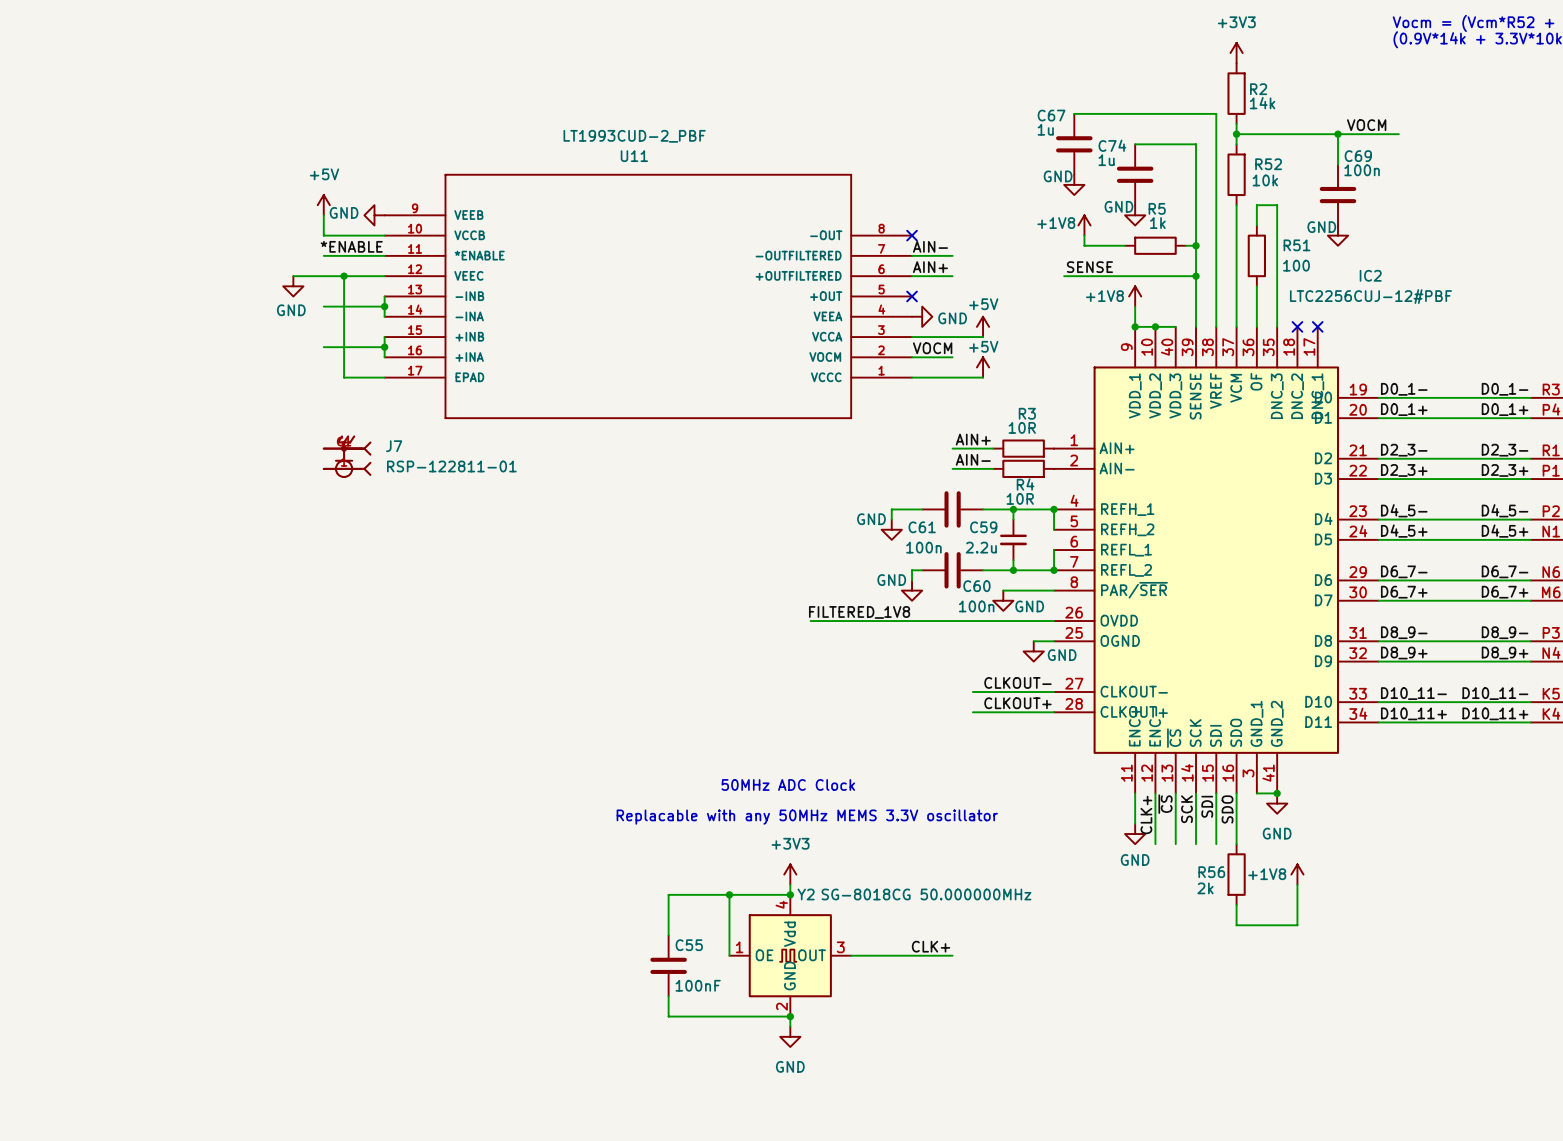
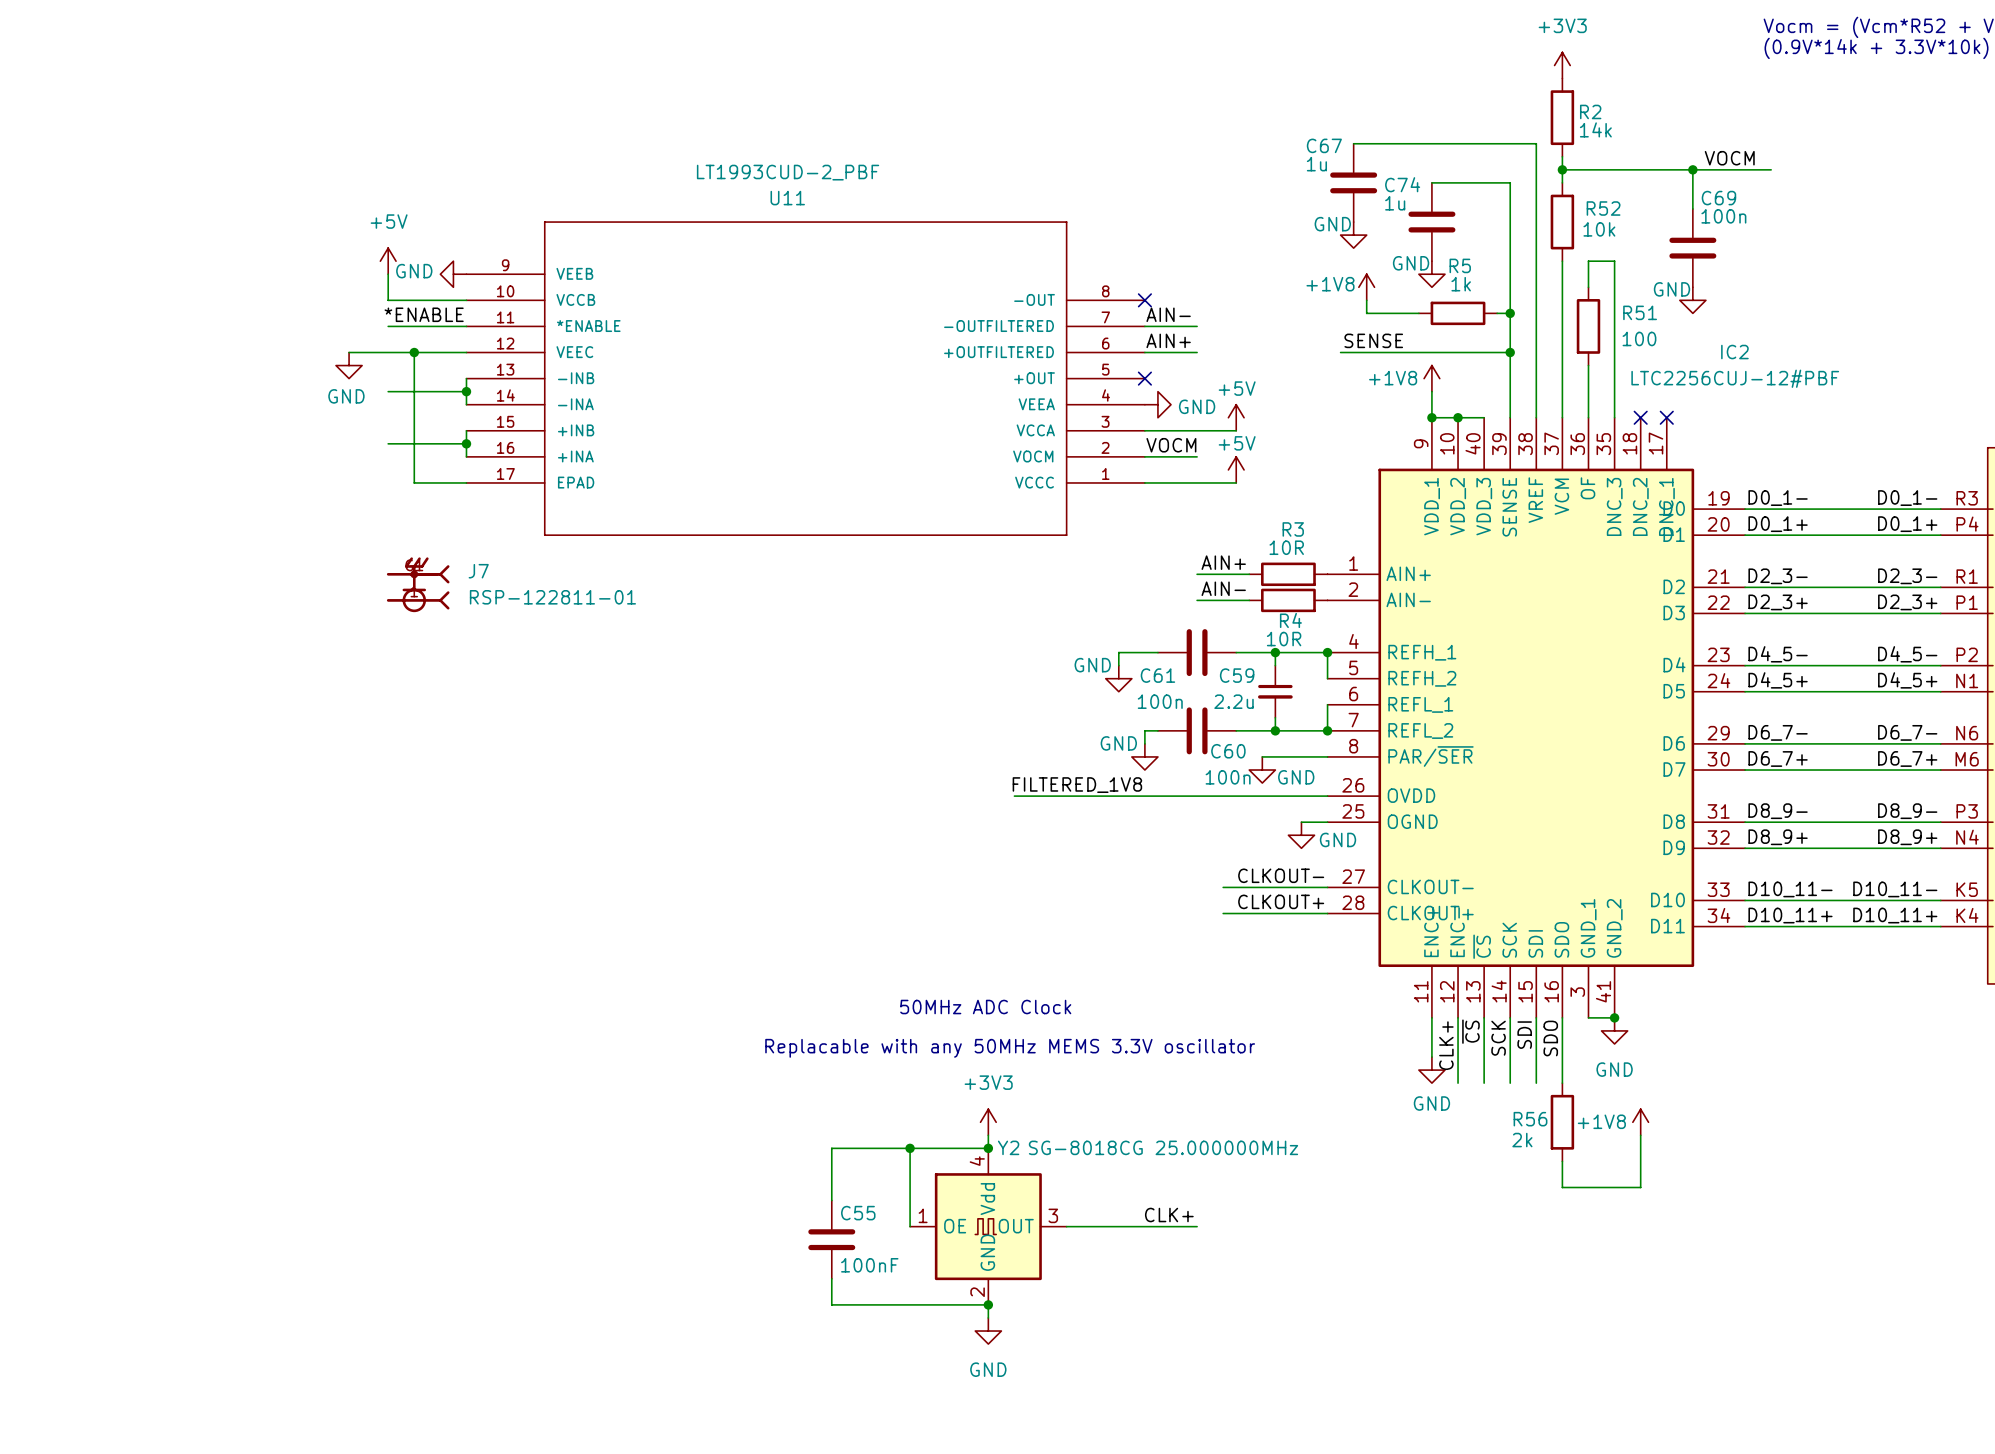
Y2 value: SG-8018CG 50.000000MHz (926, 894) -> SG-8018CG 25.000000MHz (1163, 1147)

